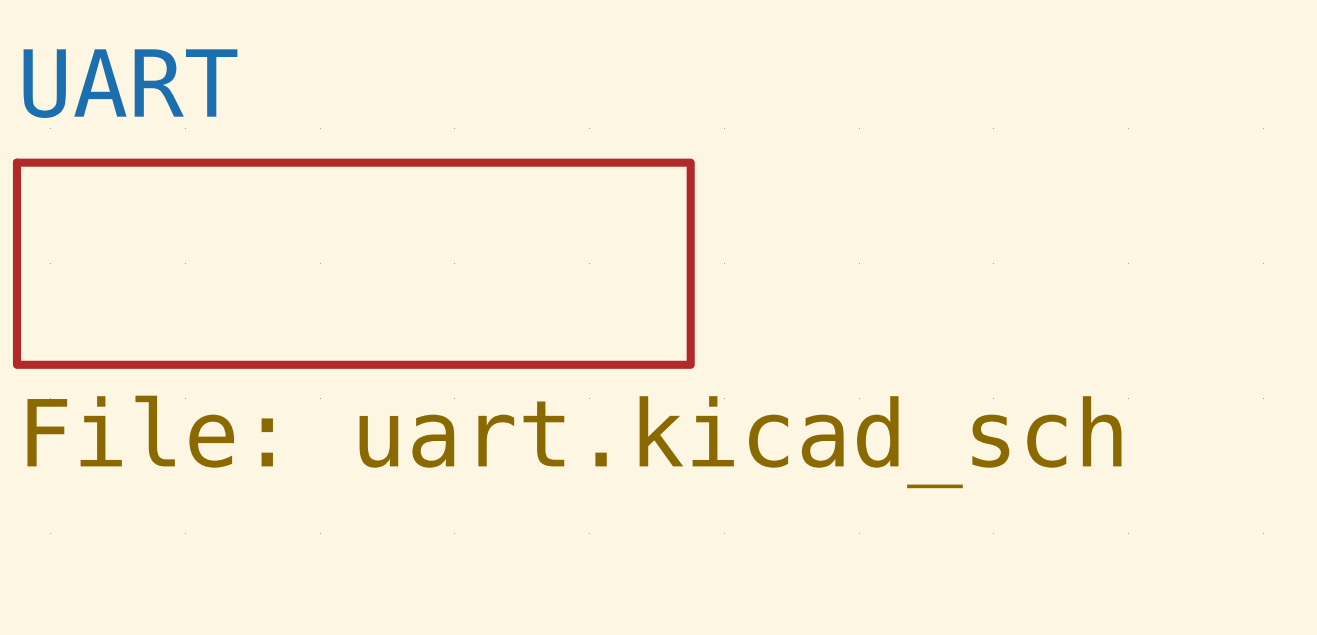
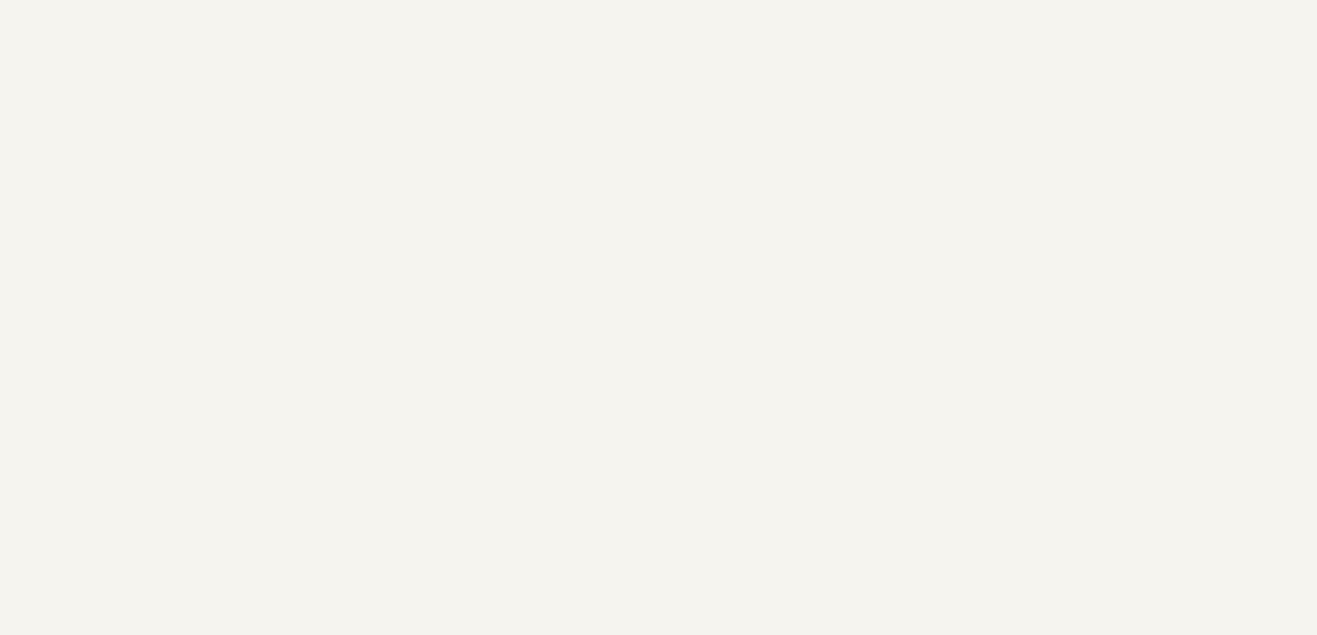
sheet UART: File: uart.kicad_sch (353, 263) -> none

